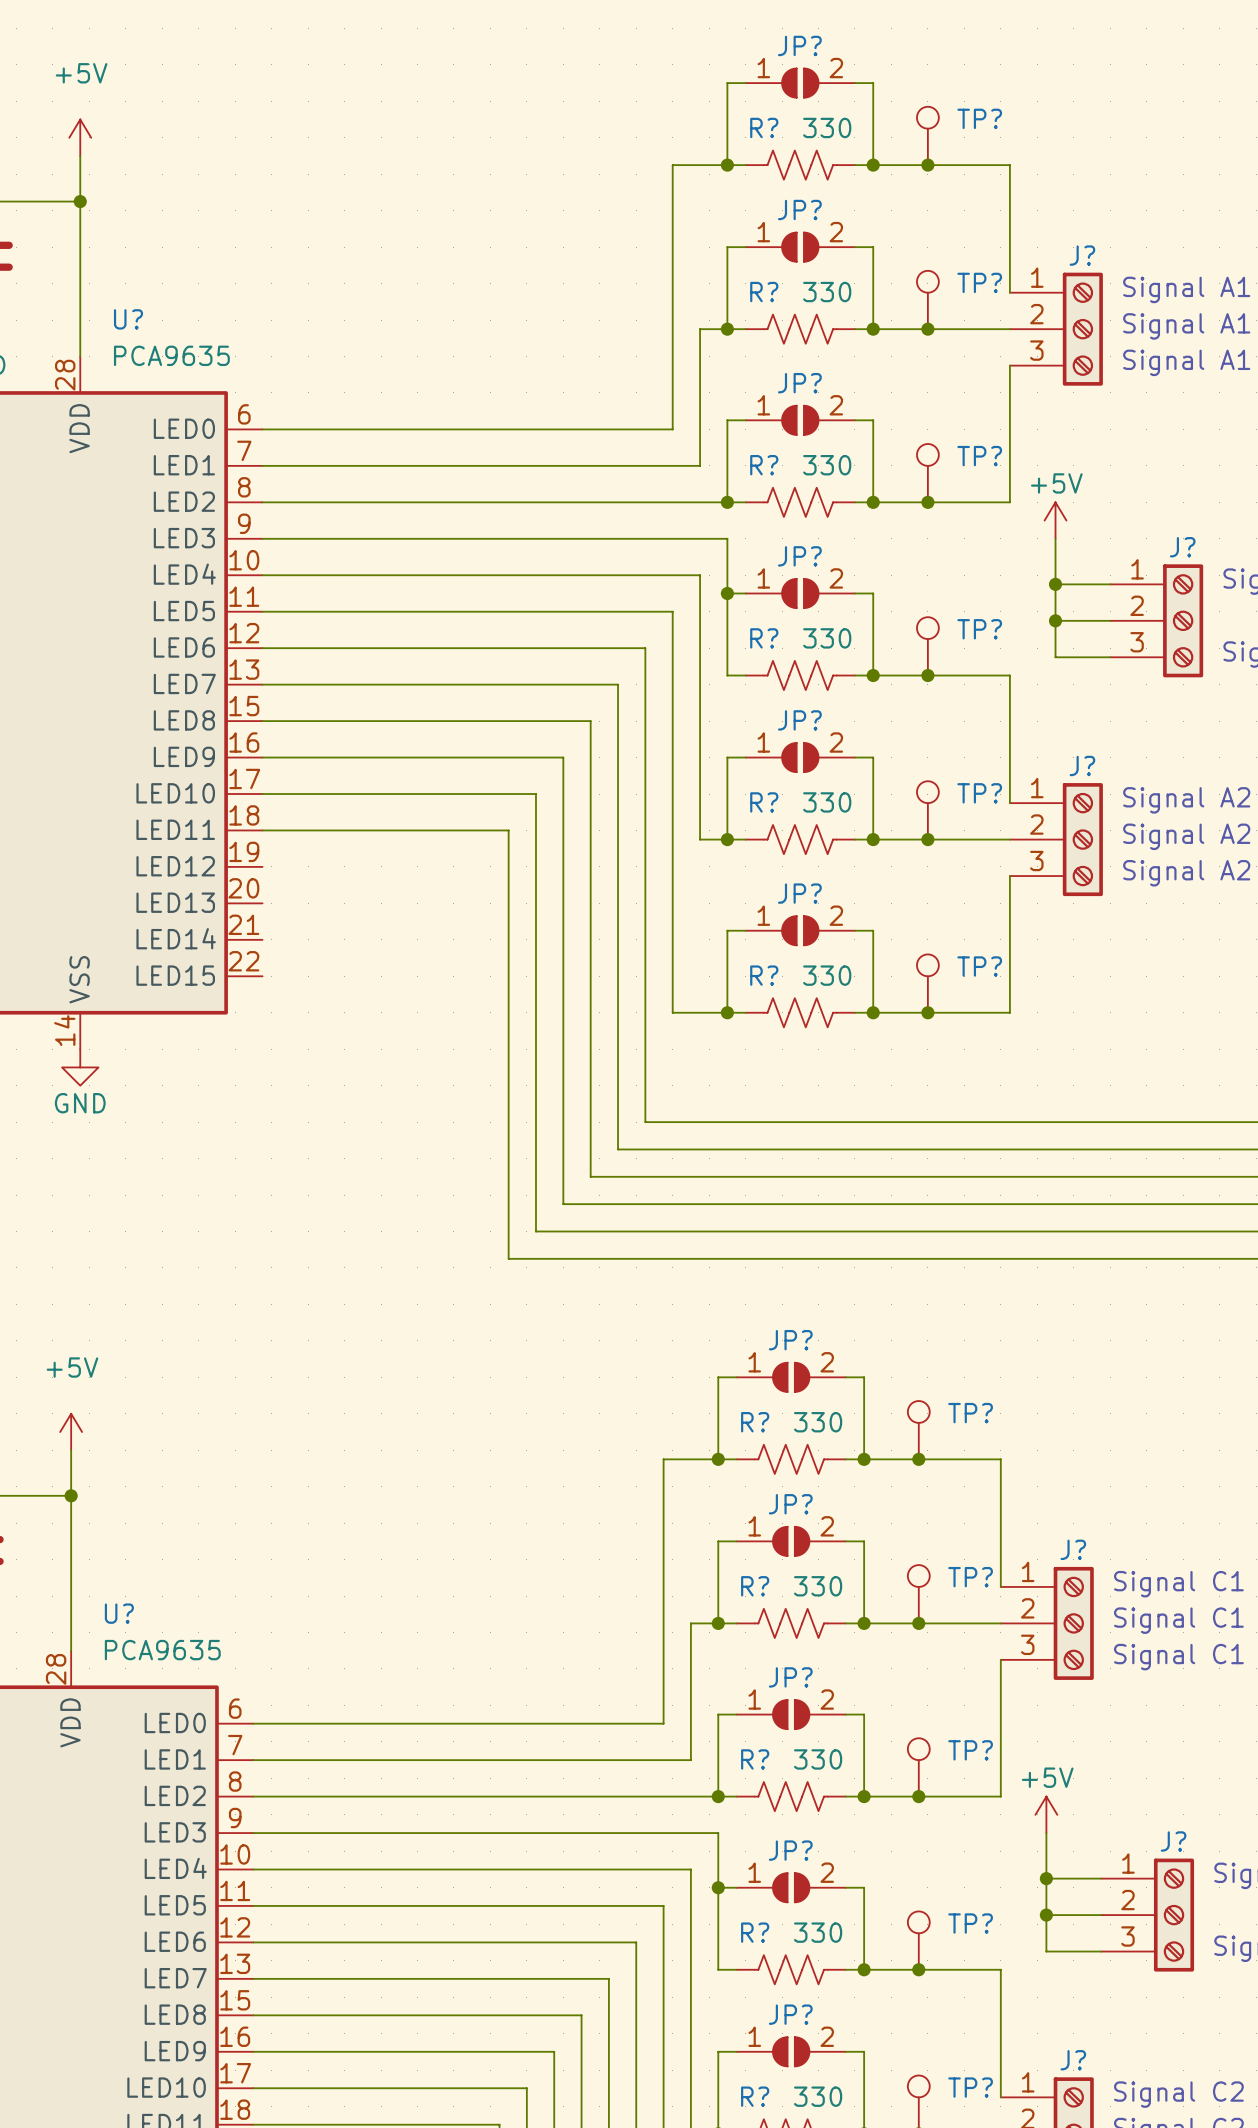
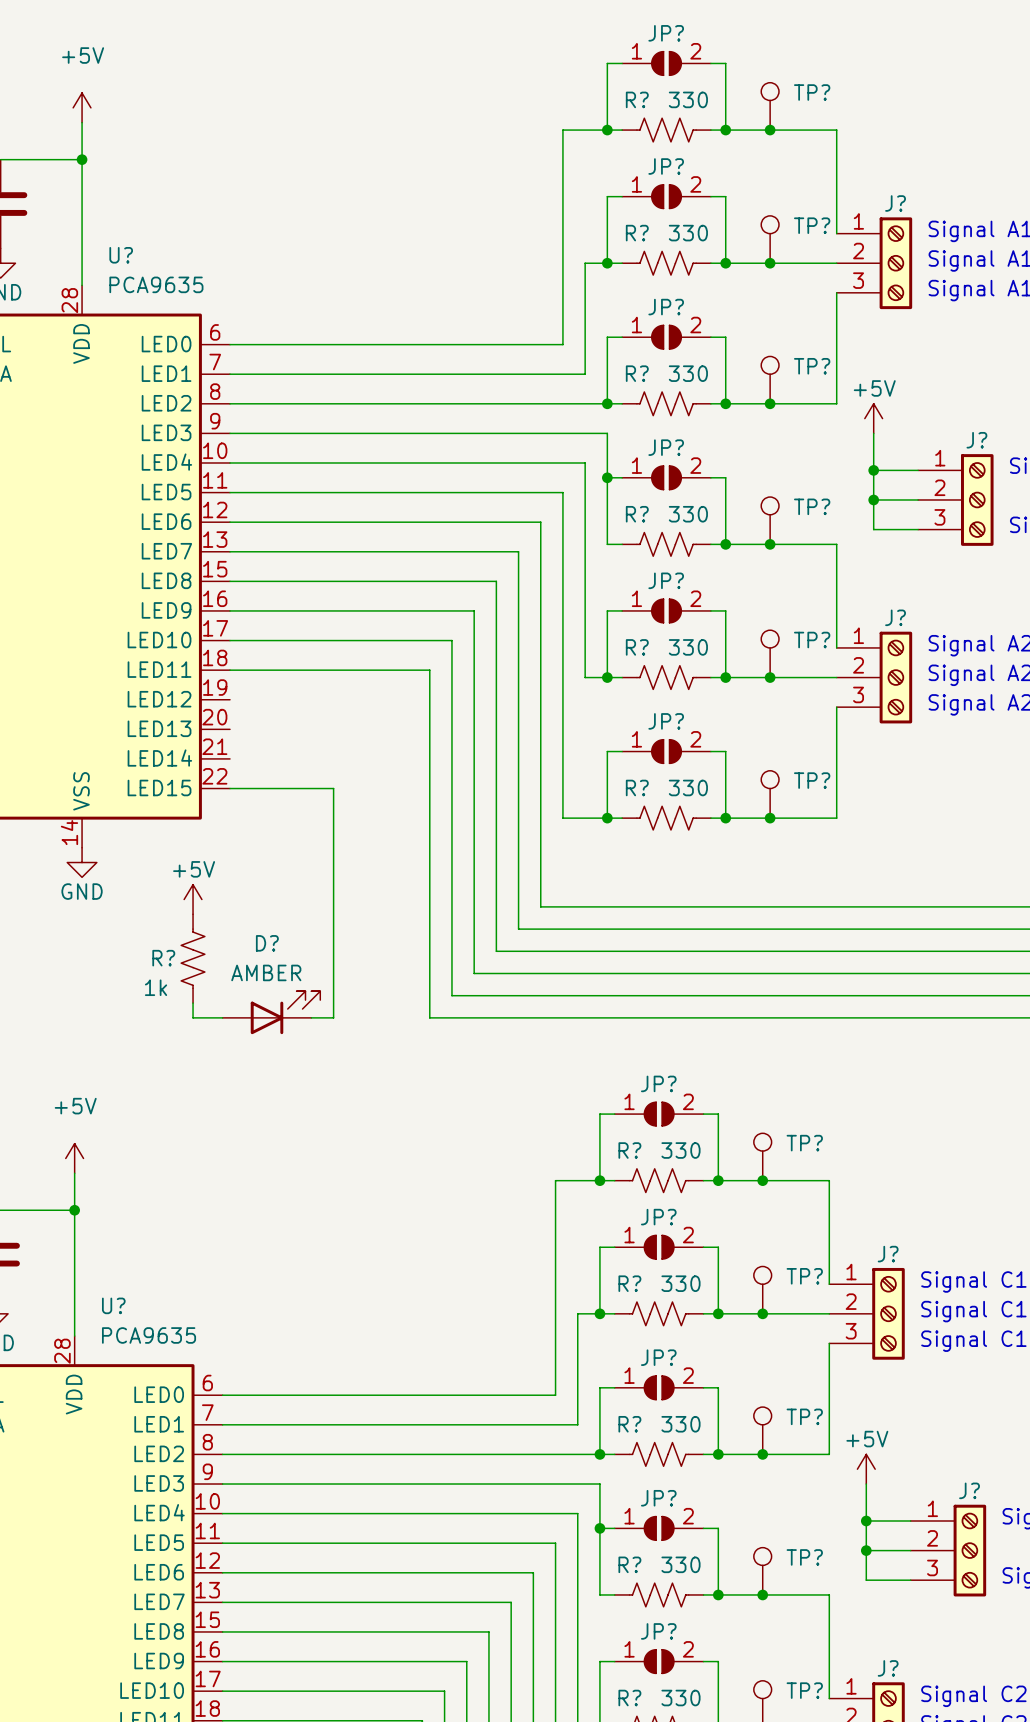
wire: none -> (230, 788) (333, 788) (333, 1017) (311, 1017)
power symbol: none -> +5V (193, 899)
R?: none -> 1k (193, 958)
wire: none -> (193, 1003) (193, 1017) (222, 1017)
D?: none -> AMBER (271, 1012)

